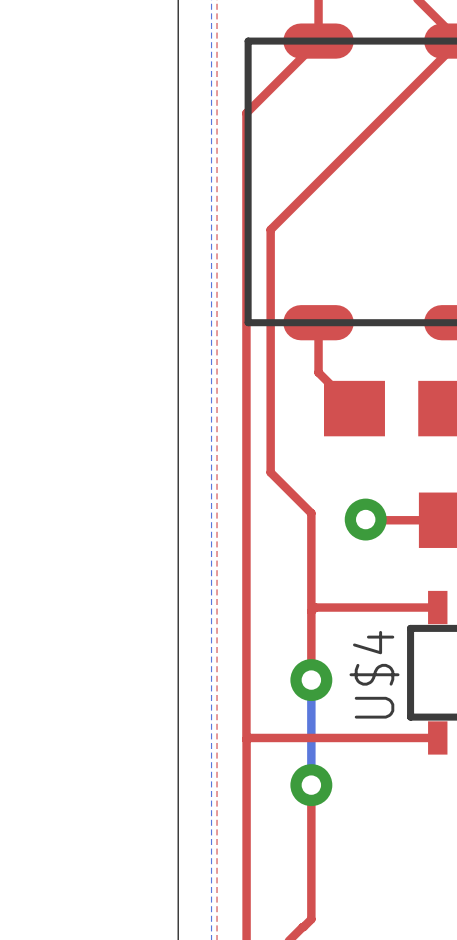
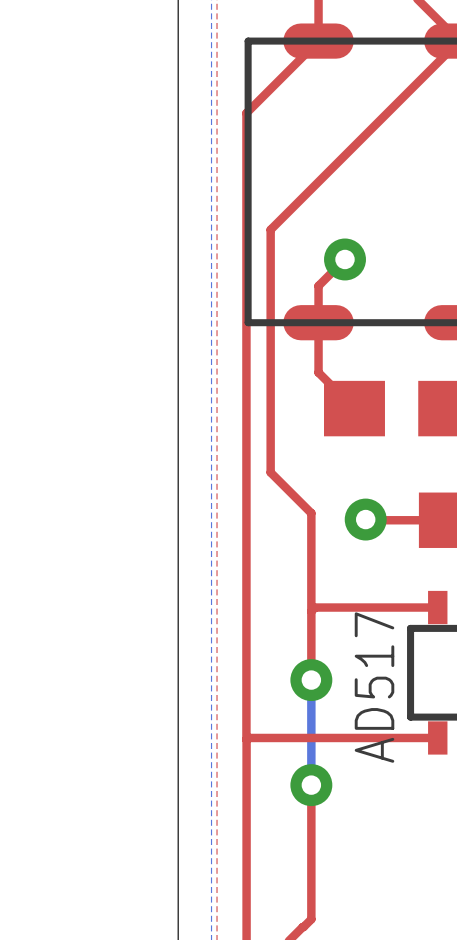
top track: none -> (345, 259) (318, 285) (318, 322)
via: none -> (345, 259)
U$4 name: U$4 (374, 674) -> AD517 (374, 687)

